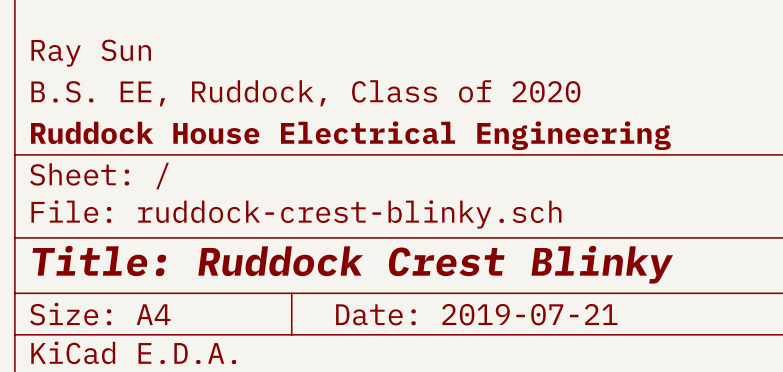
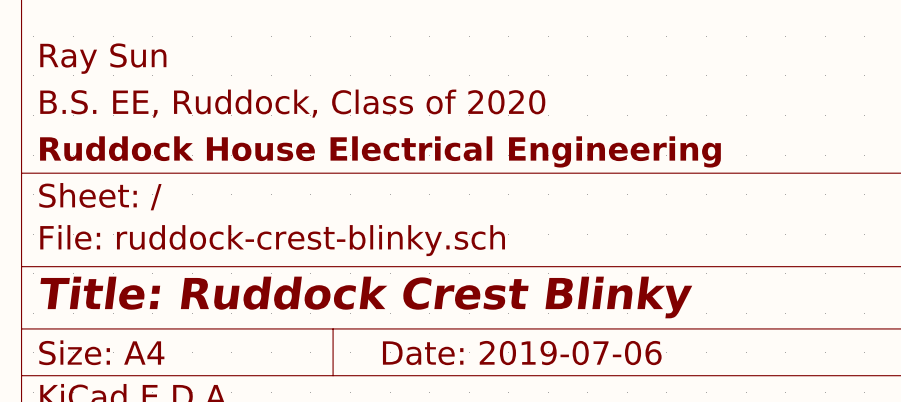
title block: Date: 2019-07-21 (476, 314) -> Date: 2019-07-06 (522, 353)

